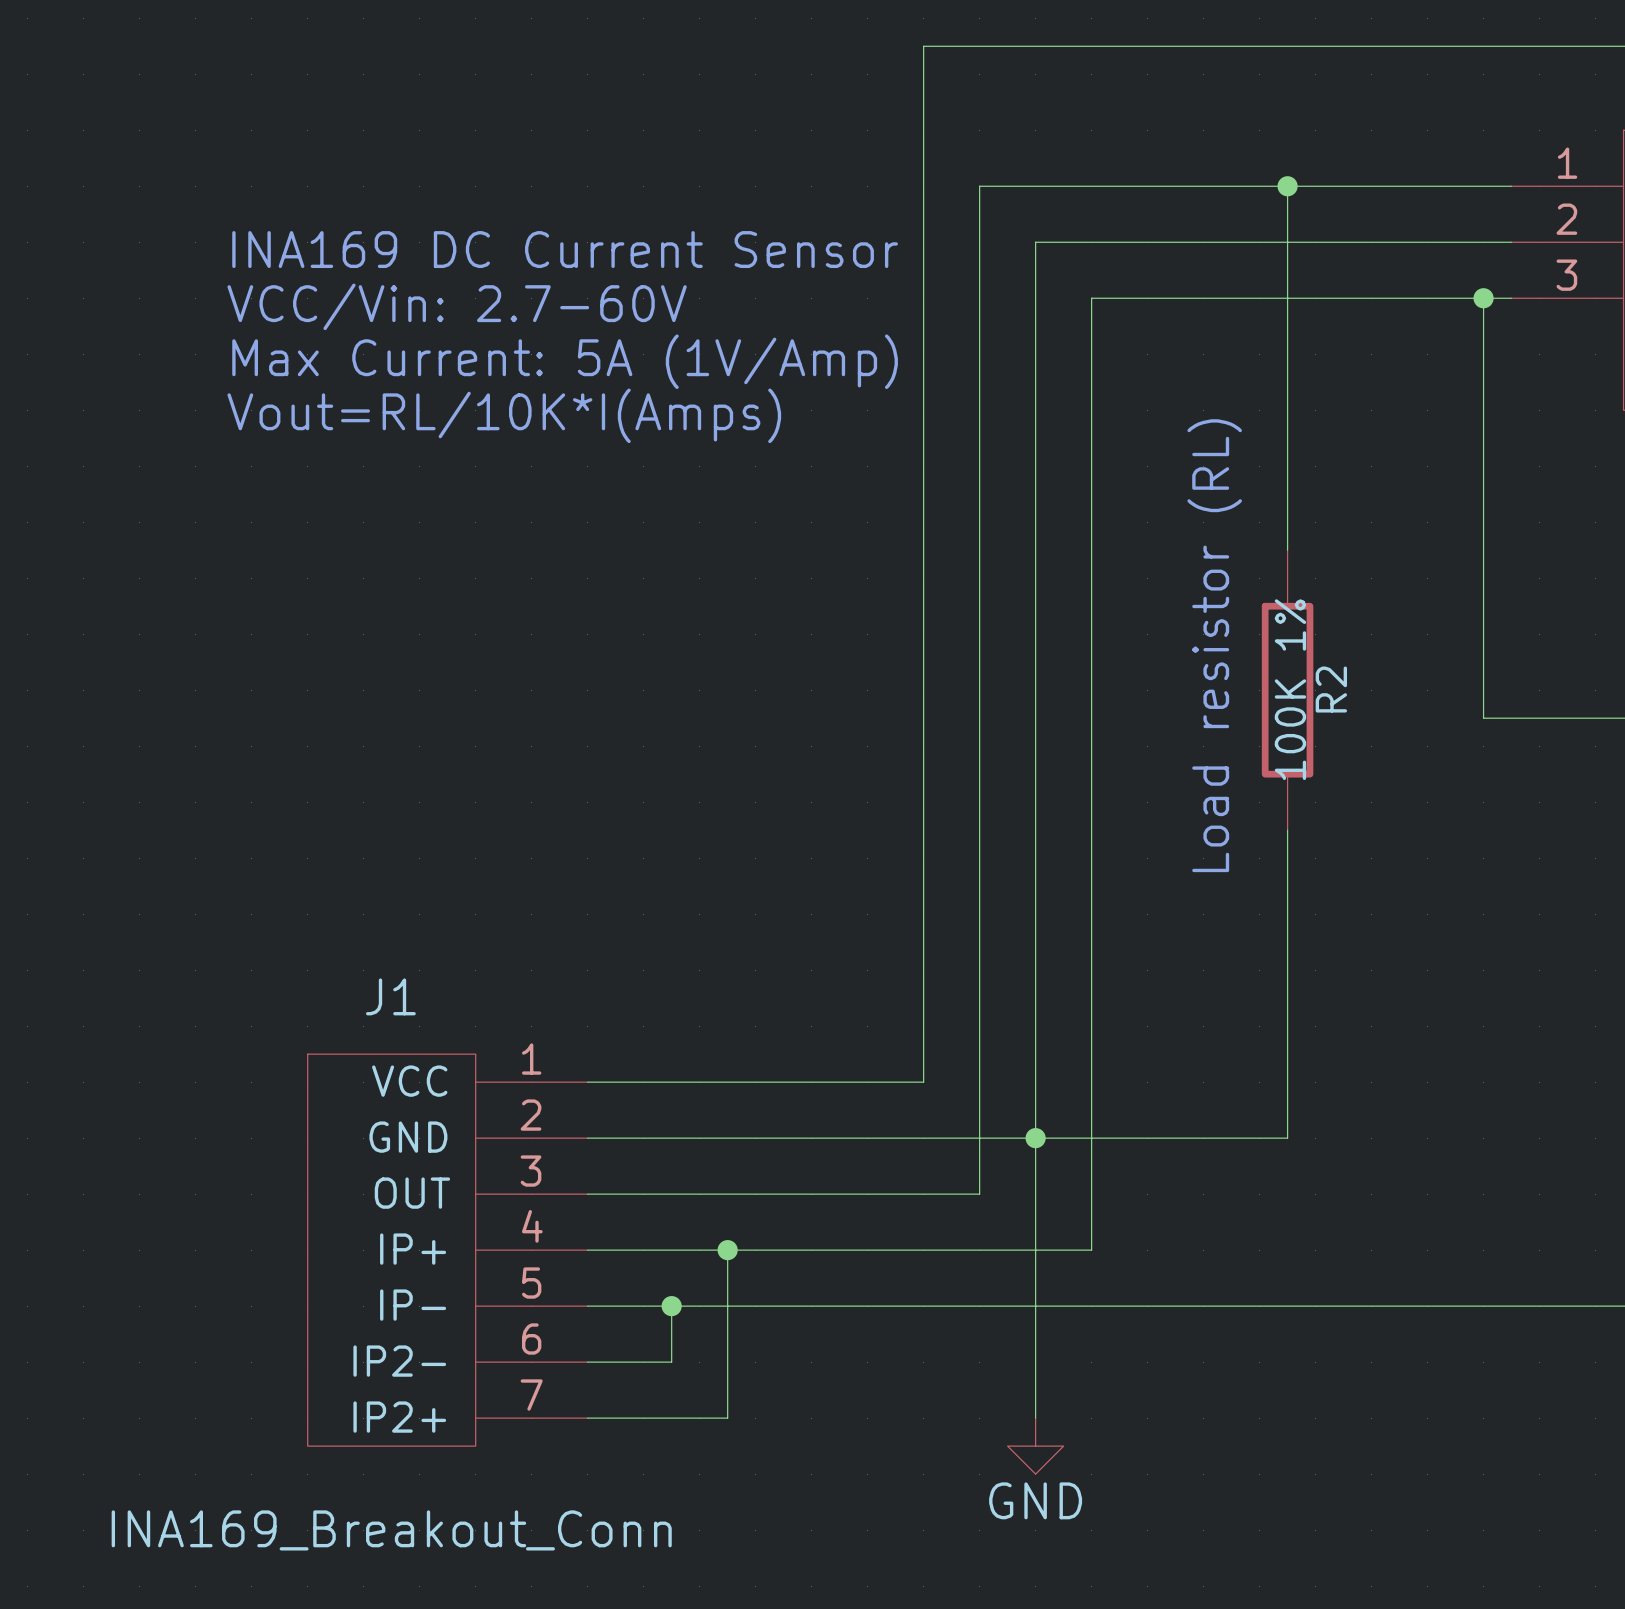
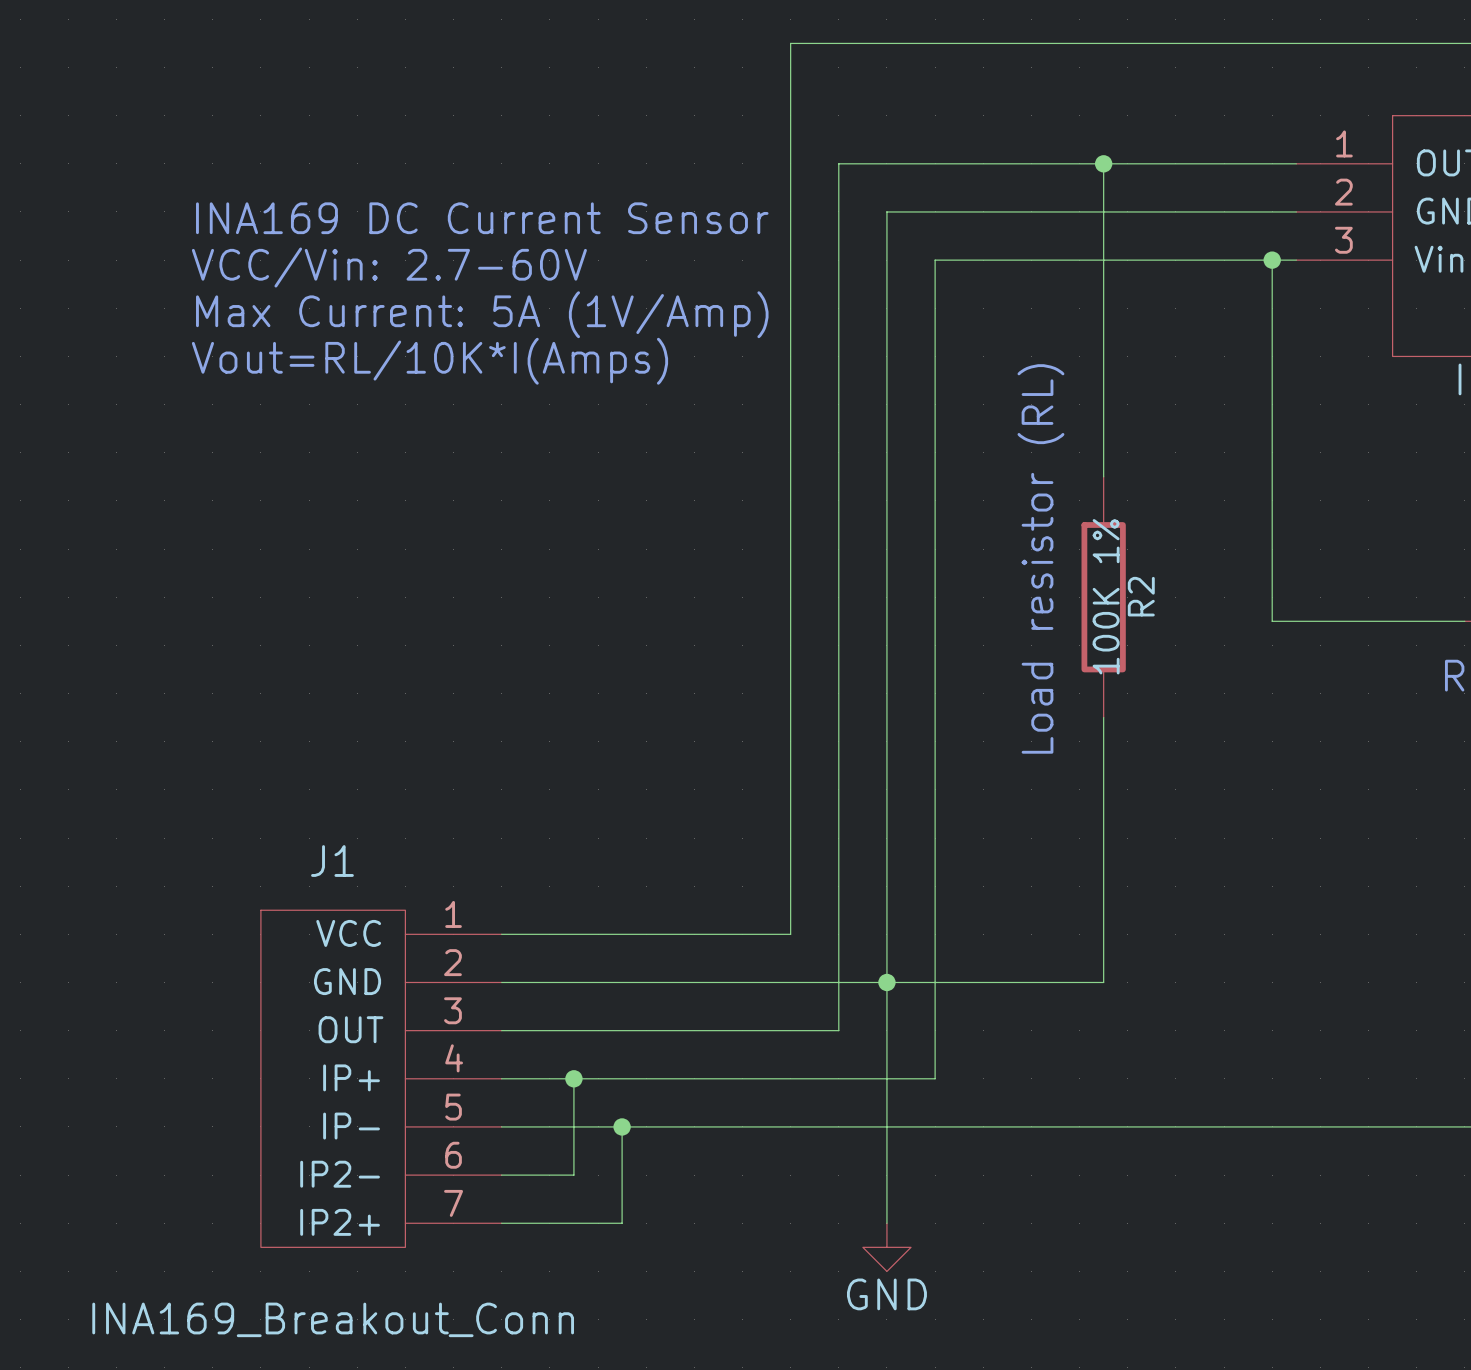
junction: none -> (573, 1078)
wire: (727, 1250) (727, 1306) -> (573, 1078) (573, 1126)
junction: (727, 1250) -> none
junction: (671, 1306) -> none
junction: none -> (622, 1126)

